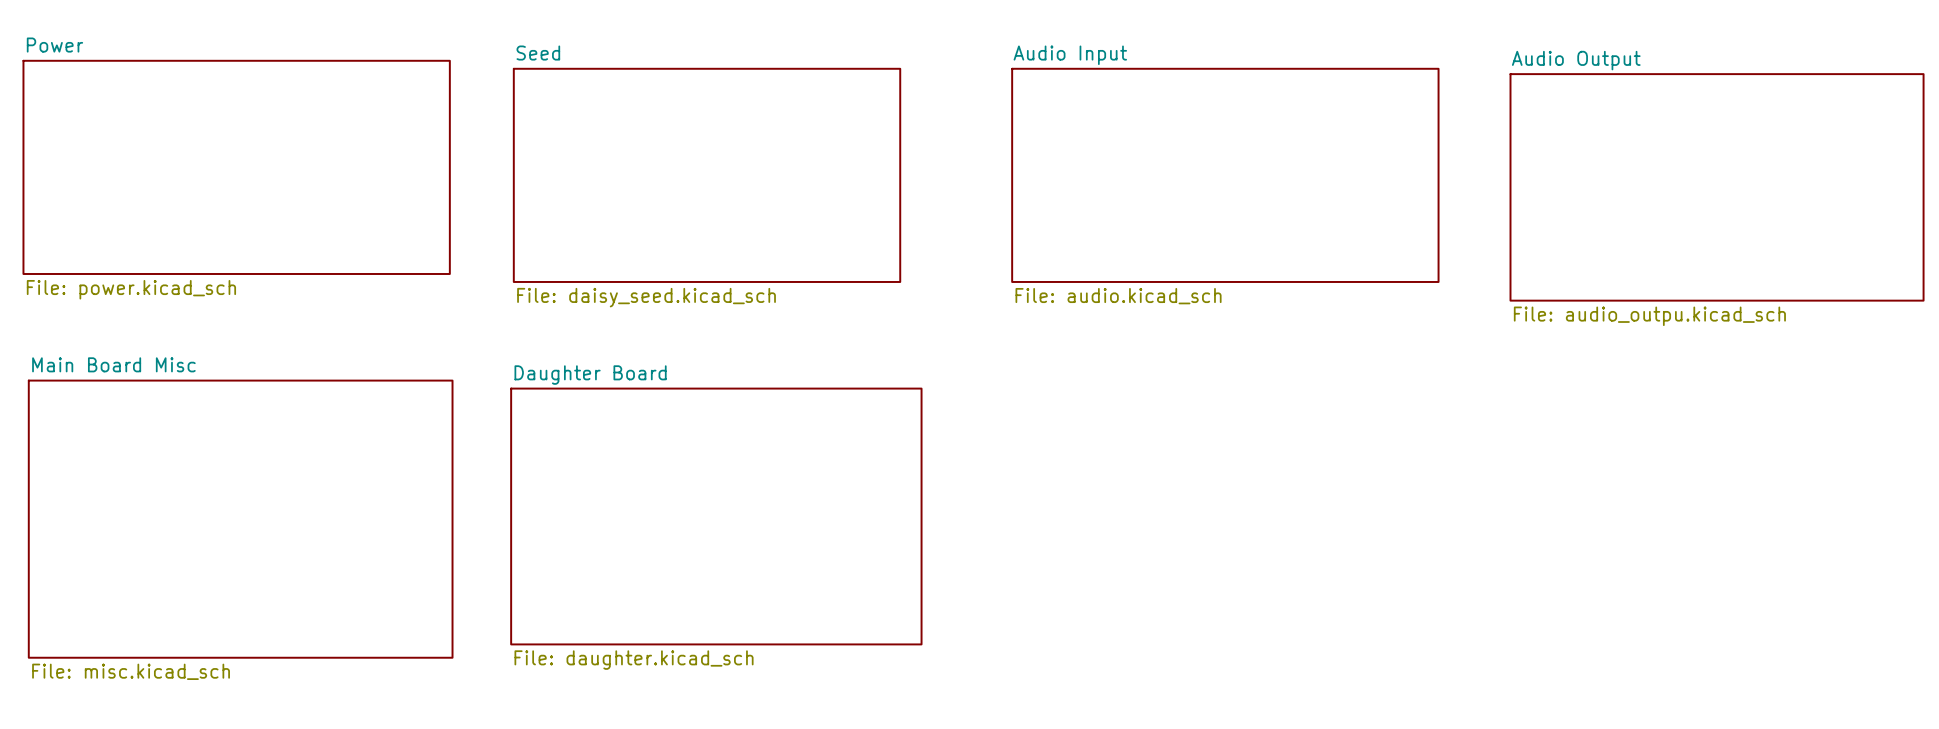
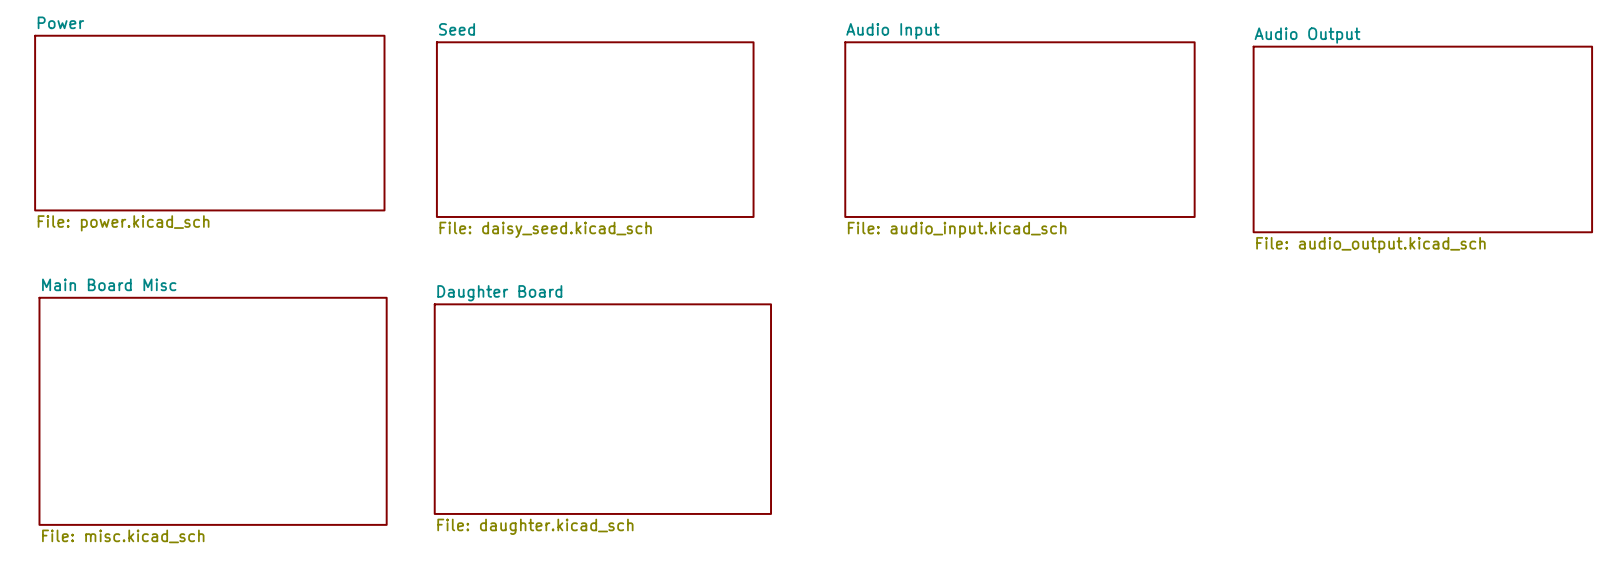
sheet Audio Input value: File: audio.kicad_sch (1118, 296) -> File: audio_input.kicad_sch (957, 229)
sheet Audio Output value: File: audio_outpu.kicad_sch (1649, 316) -> File: audio_output.kicad_sch (1370, 245)

